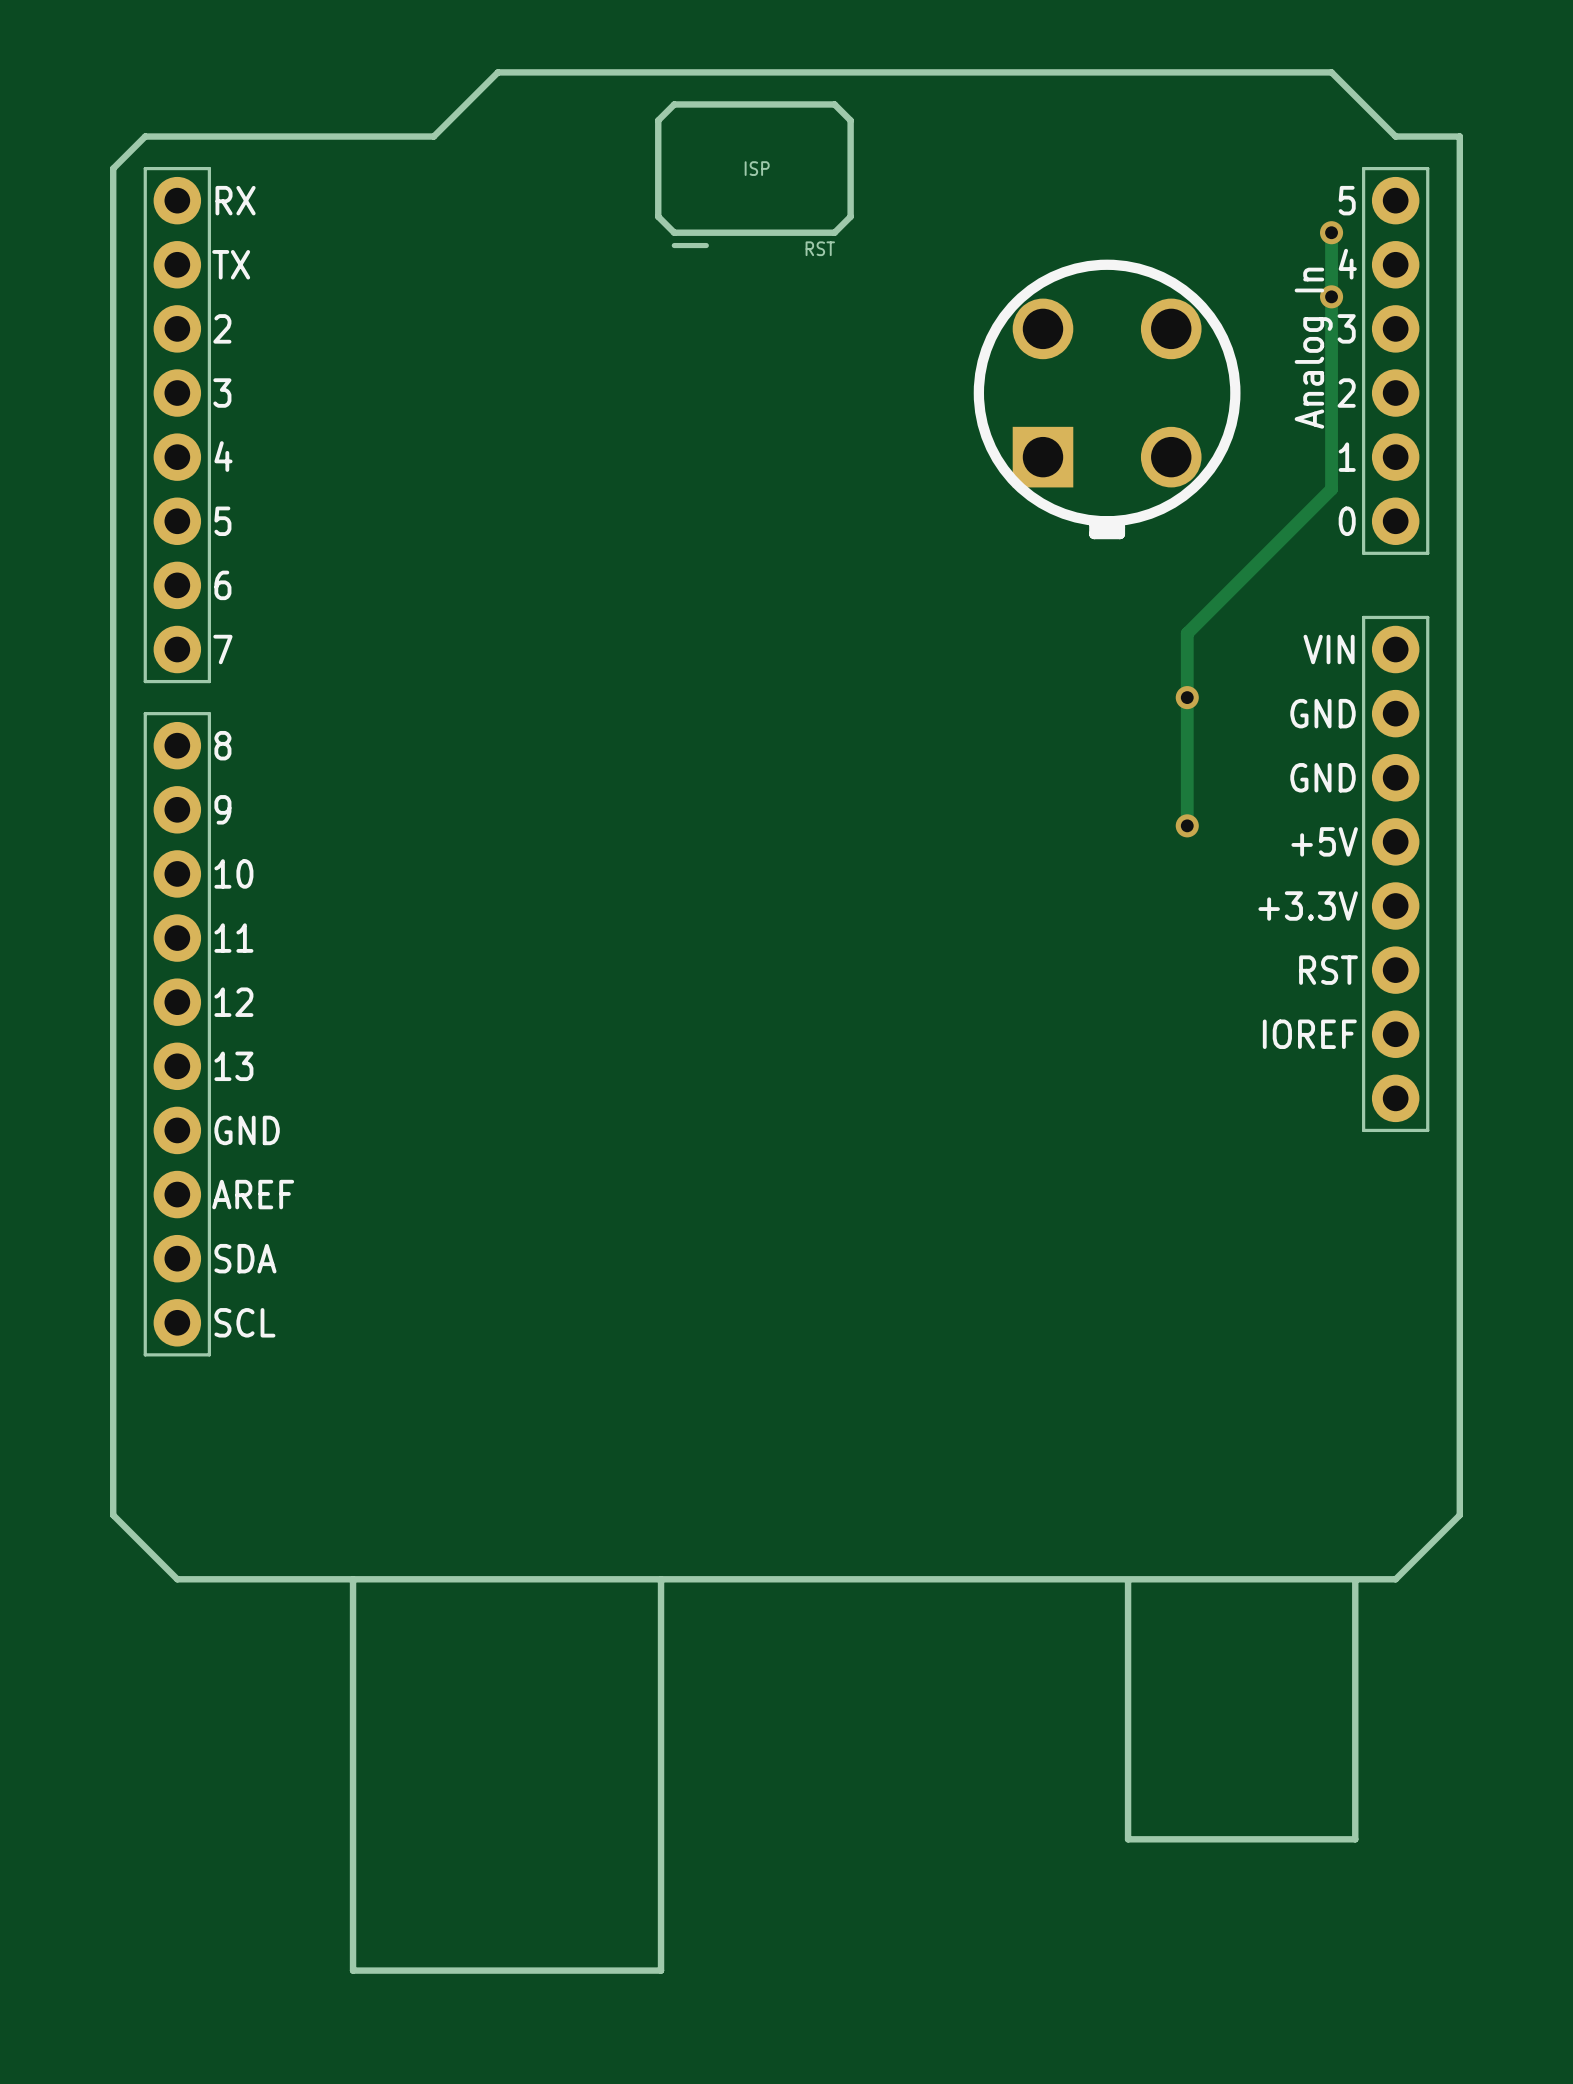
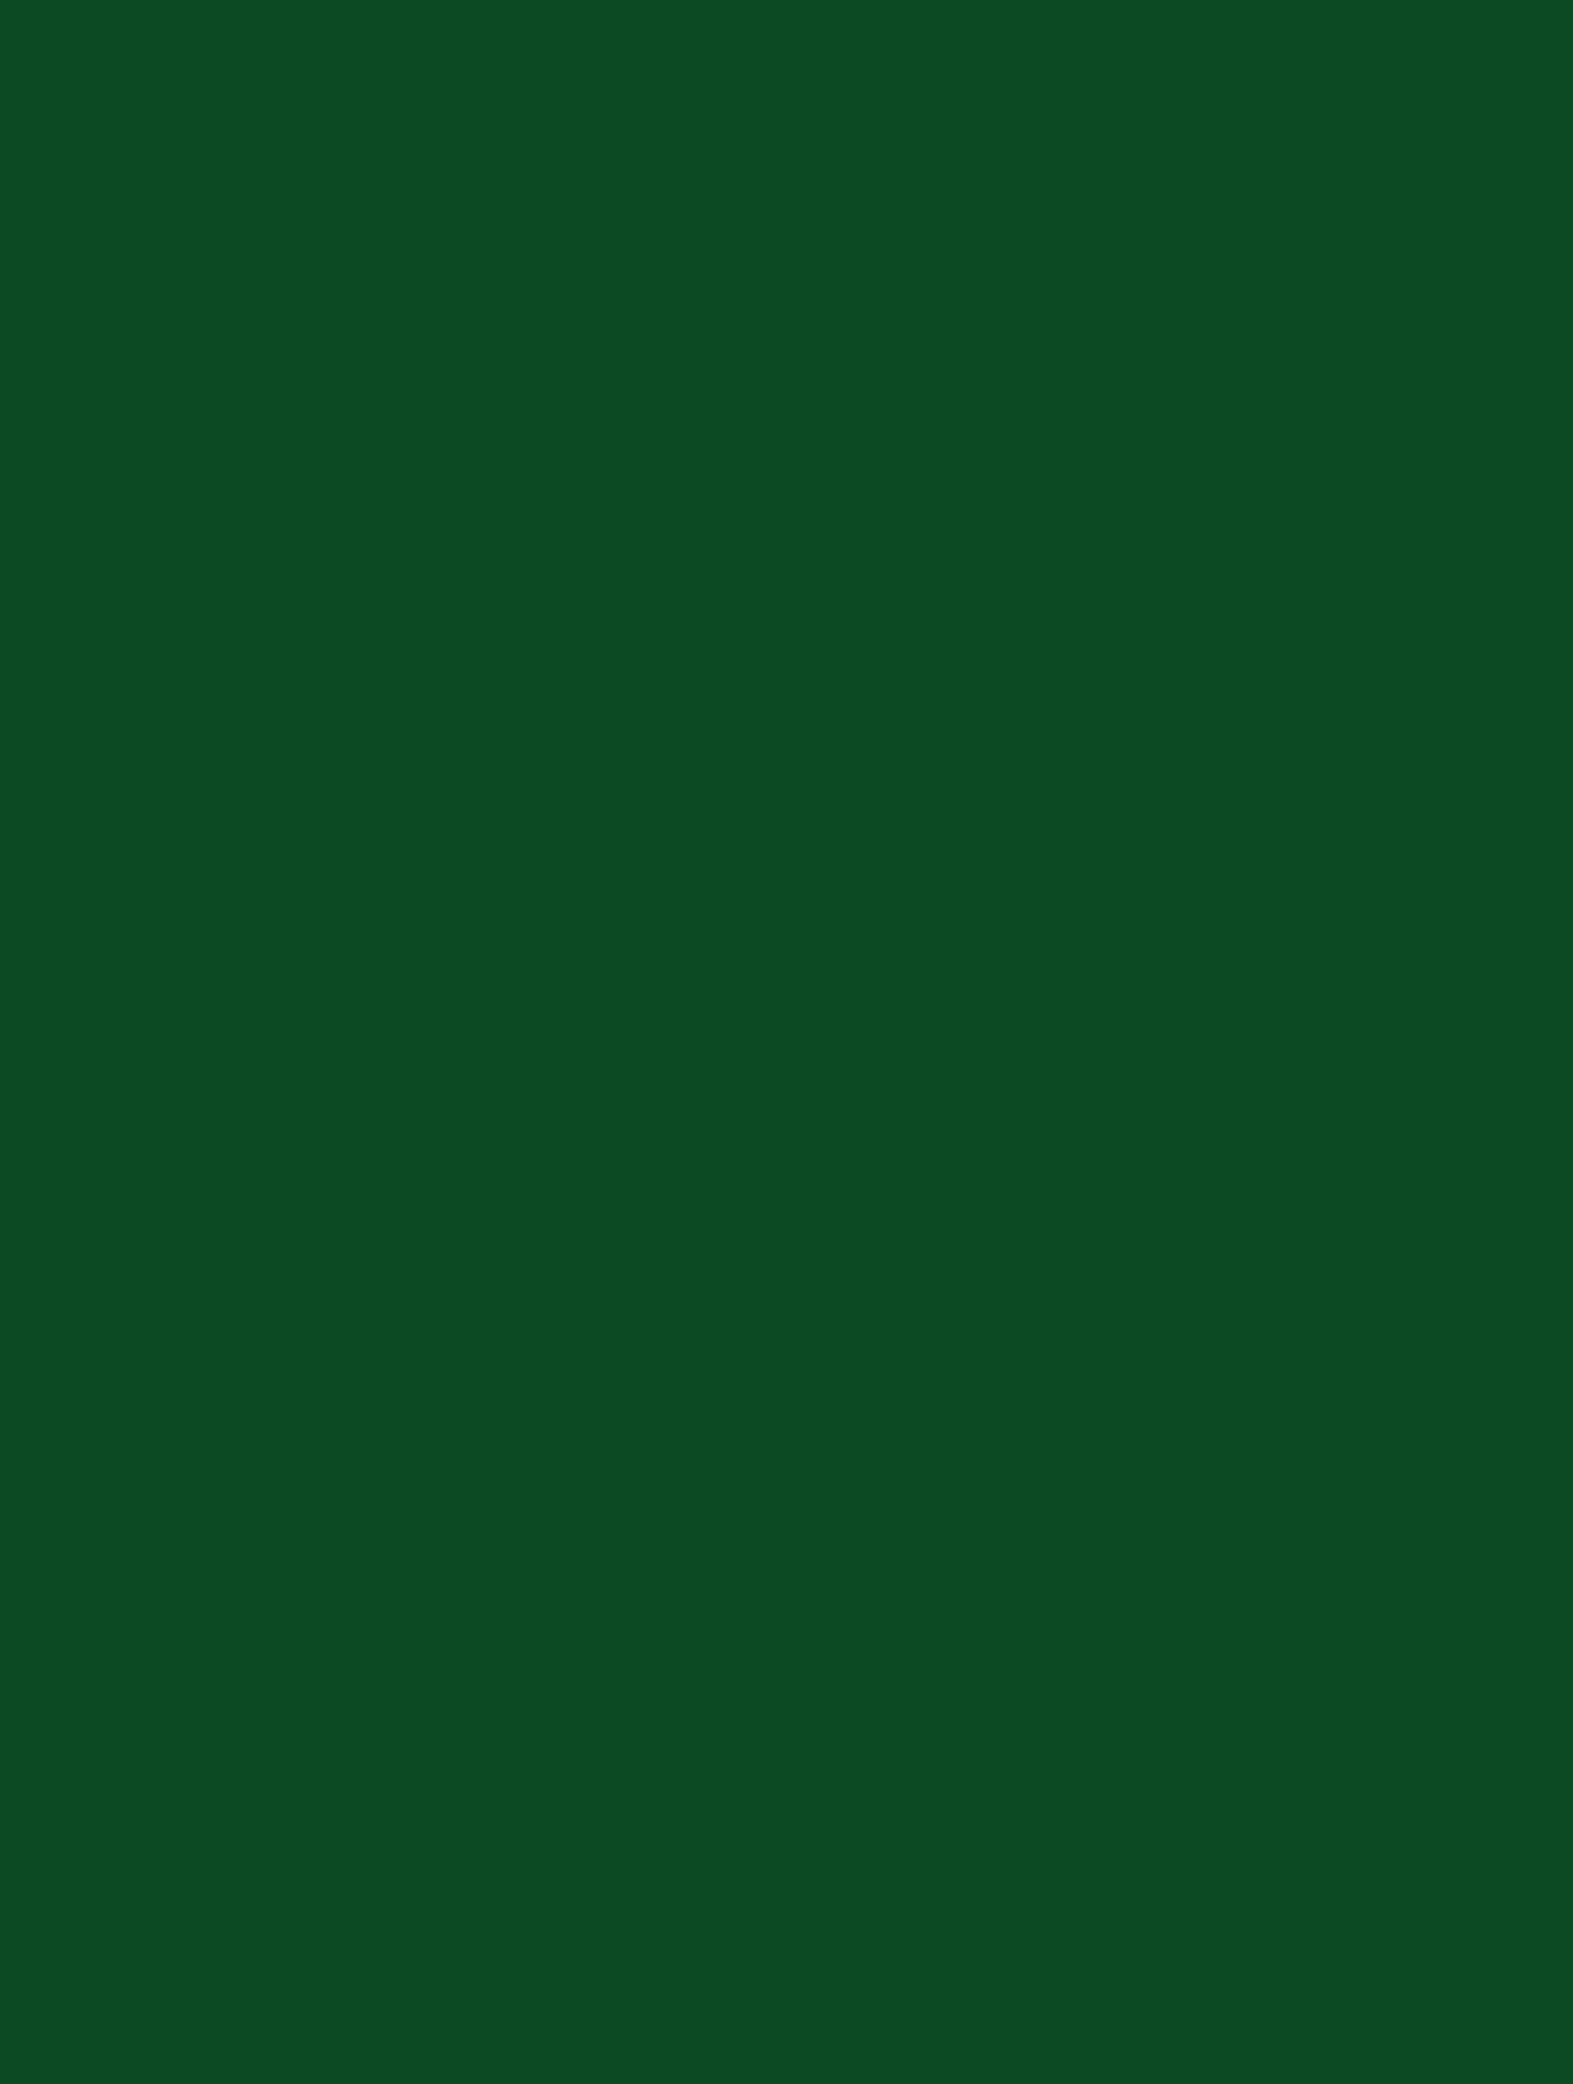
track: (1331, 232) (1331, 489) (1187, 633) (1187, 825) -> none
via: (1331, 232) -> none
via: (1331, 296) -> none
part: (1107, 399) -> none
via: (1187, 697) -> none
via: (1187, 825) -> none
part: (786, 1021) -> none

